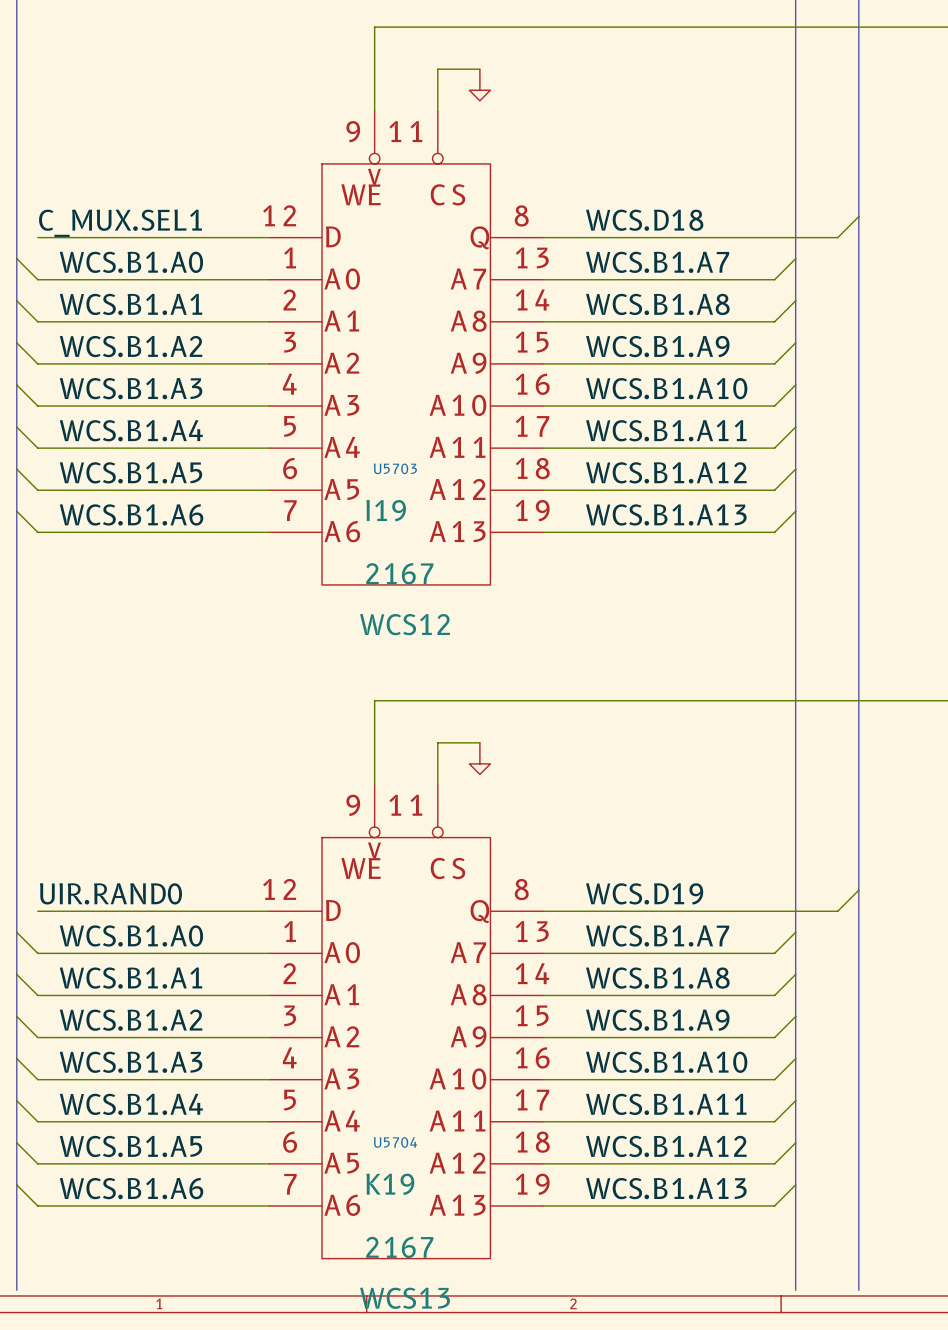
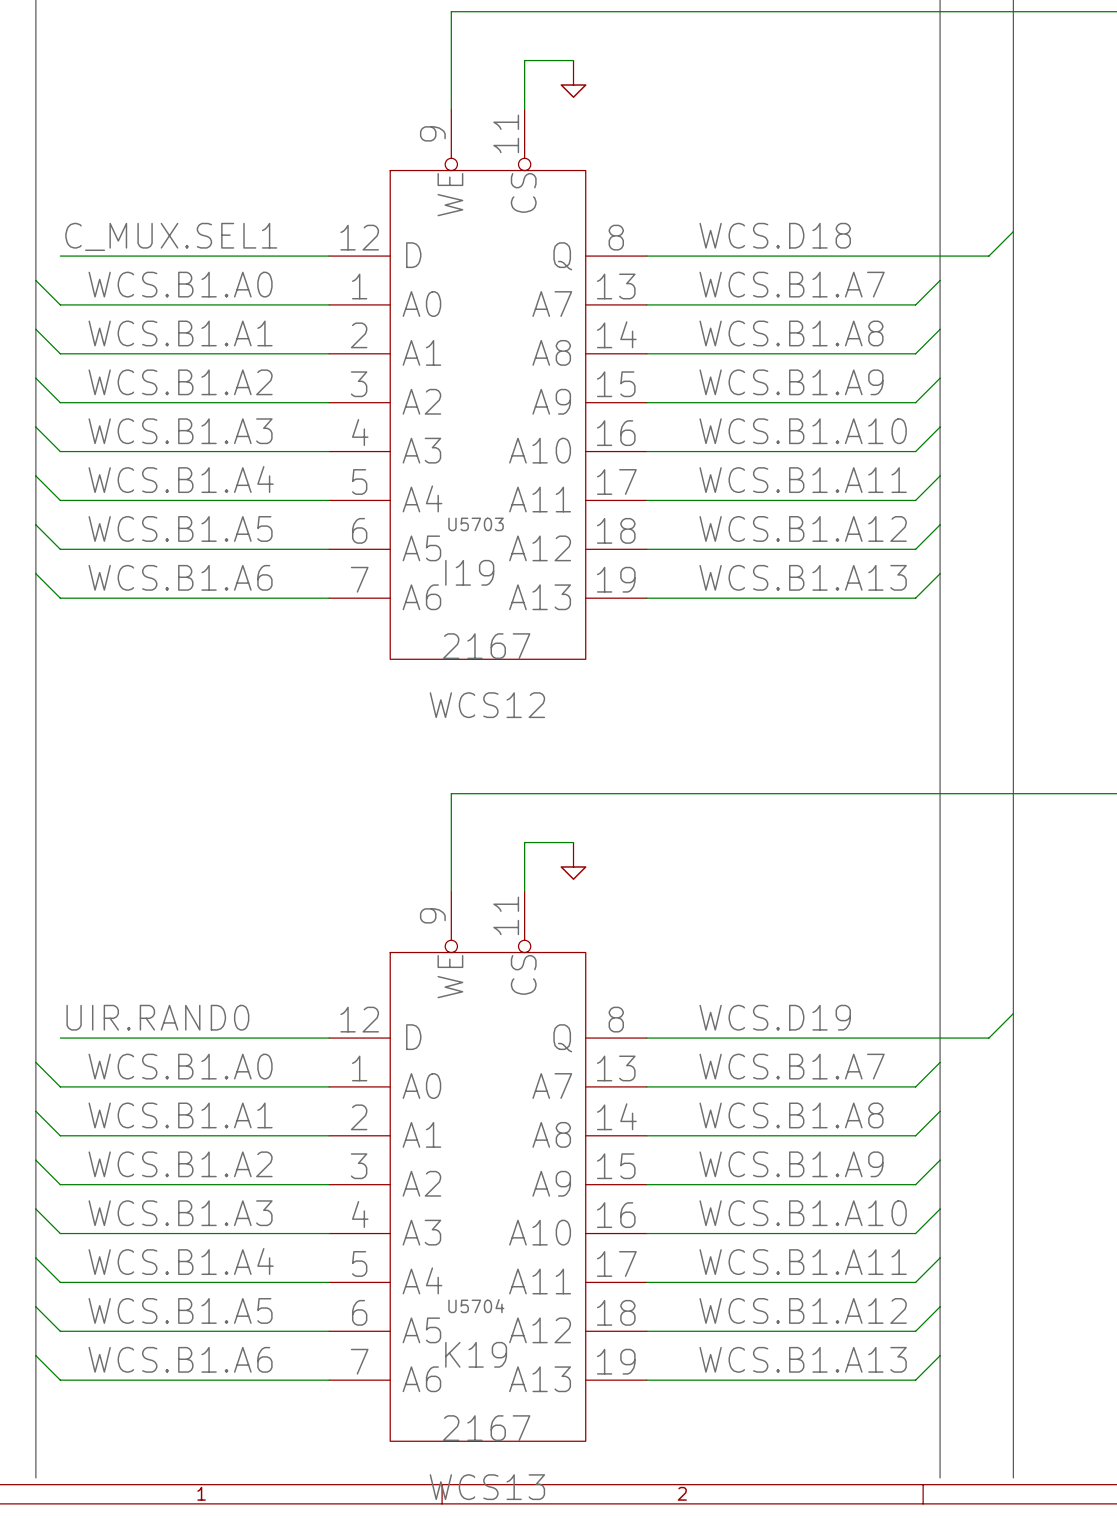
U5703 symbol: [269, 111, 544, 585] -> [329, 109, 647, 660]
U5704 symbol: [269, 784, 544, 1259] -> [329, 891, 647, 1442]

